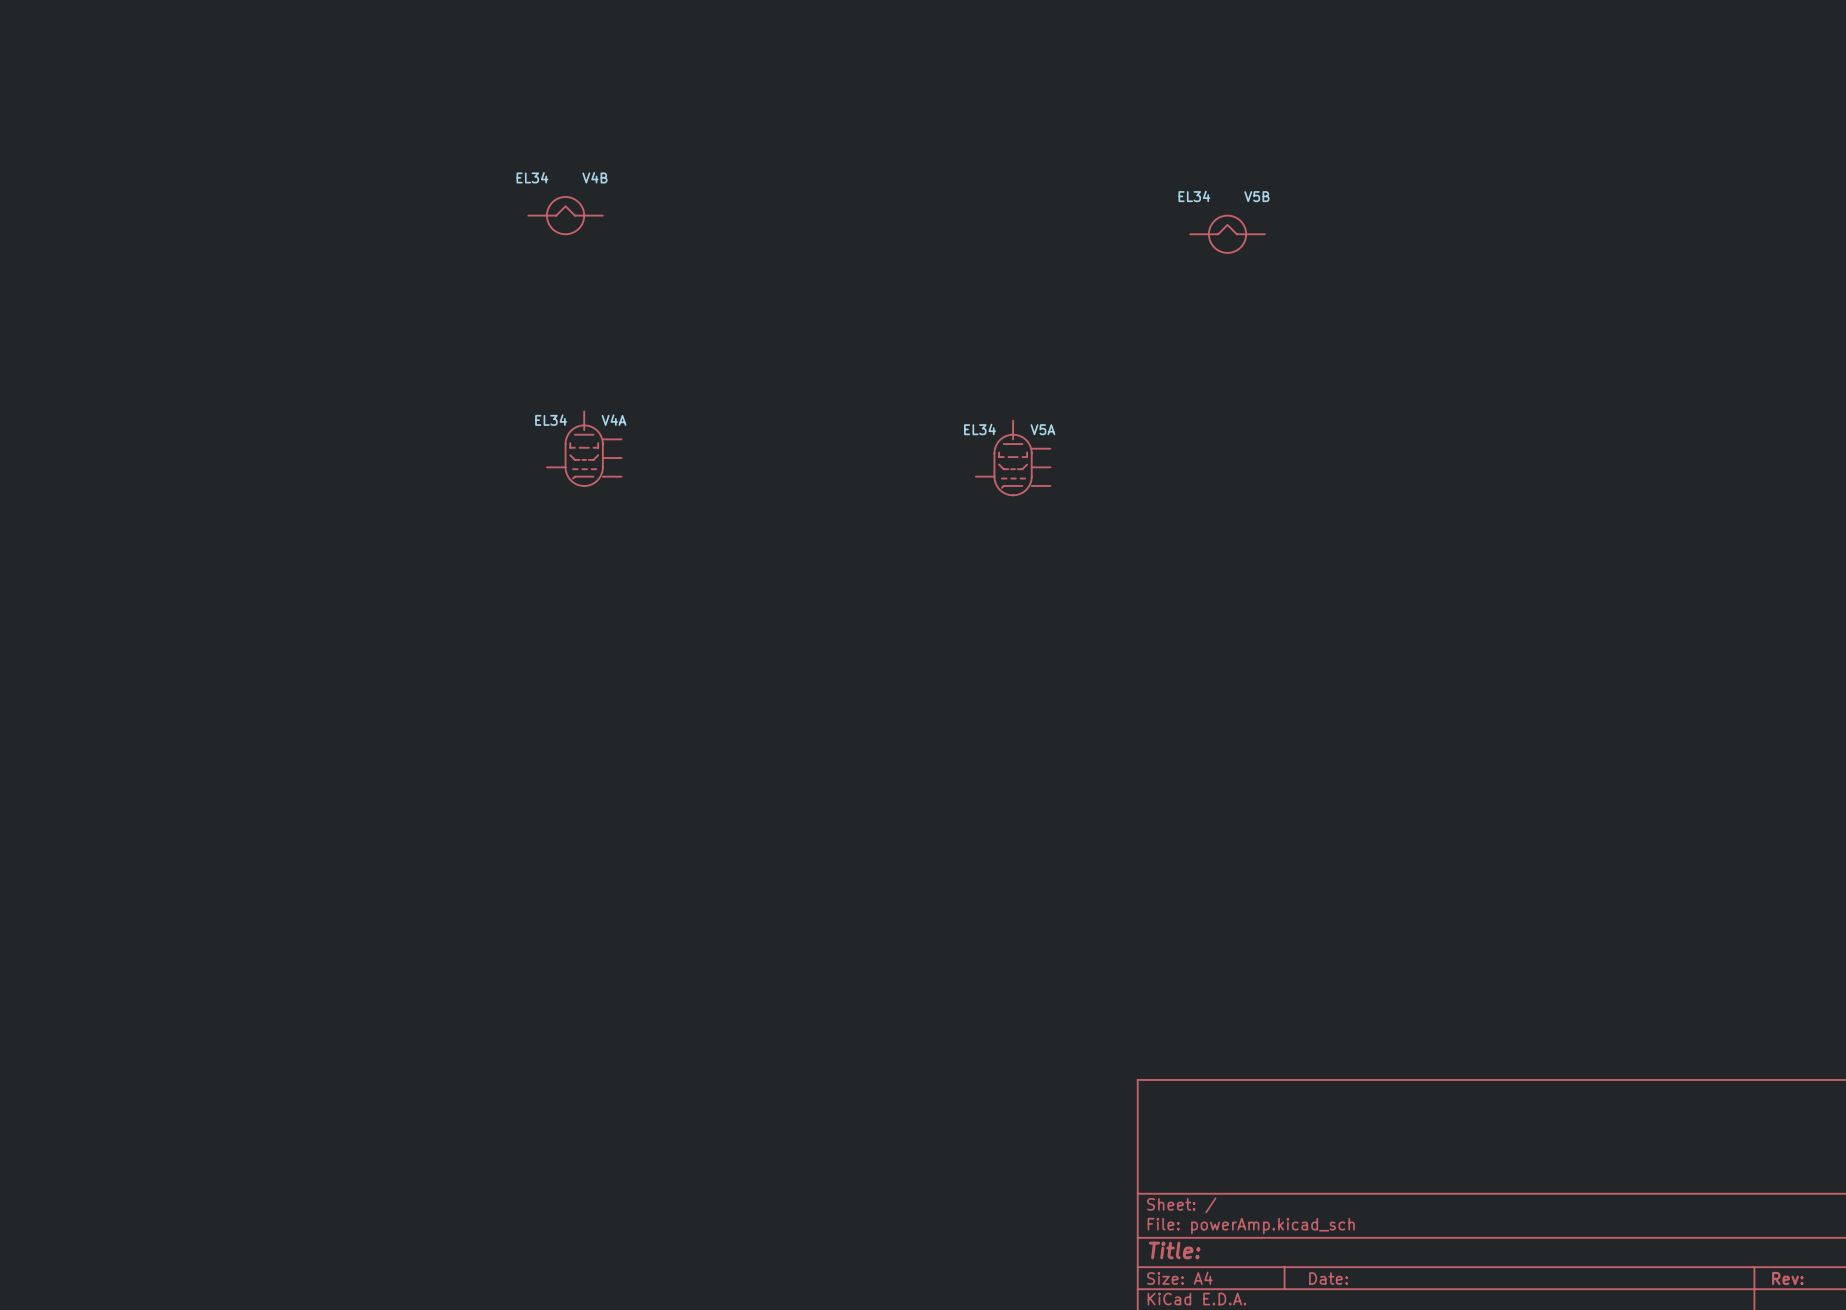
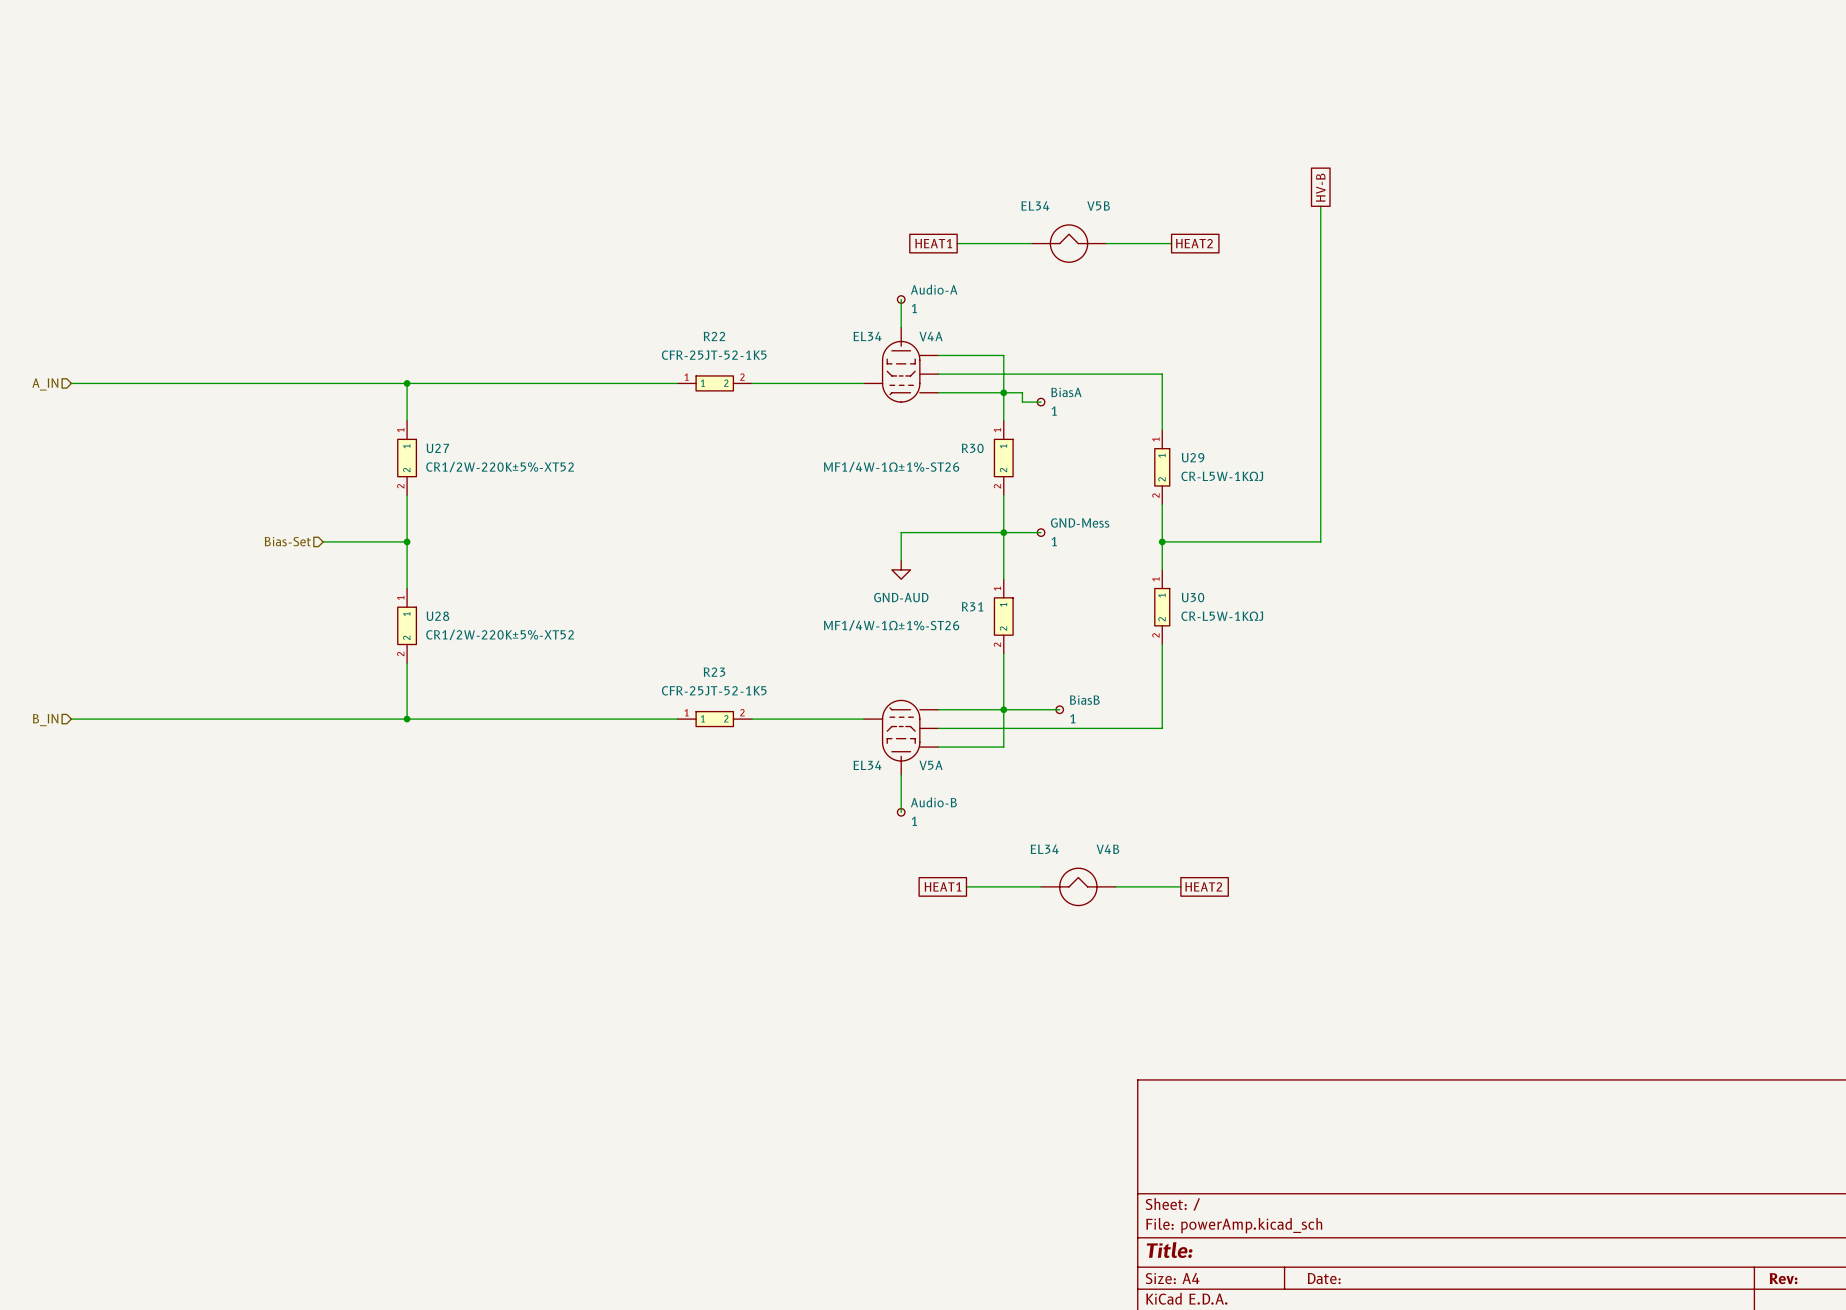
global label: none -> HV-B (1320, 187)
wire: none -> (1320, 206) (1320, 541) (1162, 541)
V4B position: (565, 215) -> (1078, 886)
V5B position: (1227, 234) -> (1069, 243)
global label: none -> HEAT1 (933, 243)
wire: none -> (957, 243) (1031, 243)
wire: none -> (1106, 243) (1171, 243)
global label: none -> HEAT2 (1194, 243)
wire: none -> (901, 299) (901, 327)
Audio-A: none -> 1 (901, 299)
wire: none -> (938, 355) (1003, 355) (1003, 420)
wire: none -> (938, 374) (1162, 374) (1162, 430)
hierarchical label: none -> A_IN (45, 384)
wire: none -> (71, 383) (677, 383)
wire: none -> (407, 383) (407, 420)
junction: none -> (407, 383)
R22: none -> CFR-25JT-52-1K5 (714, 383)
wire: none -> (752, 383) (863, 383)
wire: none -> (938, 392) (1022, 392) (1022, 402) (1041, 402)
junction: none -> (1003, 392)
BiasA: none -> 1 (1041, 402)
V4A position: (584, 448) -> (901, 364)
U27: none -> CR1/2W-220K±5%-XT52 (407, 458)
R30: none -> MF1/4W-1Ω±1%-ST26 (1003, 458)
V5A position: (1013, 458) -> (901, 737)
V5A flip: as is (1013, 465) -> up-down (901, 730)
U29: none -> CR-L5W-1KΩJ (1162, 467)
wire: none -> (407, 495) (407, 588)
wire: none -> (1003, 495) (1003, 579)
wire: none -> (1162, 504) (1162, 569)
junction: none -> (1003, 532)
wire: none -> (1041, 532) (901, 532) (901, 560)
GND-Mess: none -> 1 (1041, 532)
hierarchical label: none -> Bias-Set (287, 541)
wire: none -> (323, 541) (407, 541)
junction: none -> (407, 541)
junction: none -> (1162, 541)
power symbol: none -> GND-AUD (901, 569)
U30: none -> CR-L5W-1KΩJ (1162, 607)
R31: none -> MF1/4W-1Ω±1%-ST26 (1003, 616)
U28: none -> CR1/2W-220K±5%-XT52 (407, 625)
wire: none -> (1162, 644) (1162, 728) (938, 728)
wire: none -> (1003, 653) (1003, 747) (938, 747)
wire: none -> (407, 663) (407, 719)
wire: none -> (938, 709) (1059, 709)
junction: none -> (1003, 709)
BiasB: none -> 1 (1059, 709)
hierarchical label: none -> B_IN (45, 720)
wire: none -> (71, 719) (677, 719)
junction: none -> (407, 719)
R23: none -> CFR-25JT-52-1K5 (714, 719)
wire: none -> (752, 719) (863, 719)
wire: none -> (901, 775) (901, 812)
Audio-B: none -> 1 (901, 812)
global label: none -> HEAT1 (943, 886)
wire: none -> (966, 886) (1041, 886)
wire: none -> (1115, 886) (1180, 886)
global label: none -> HEAT2 (1203, 886)

